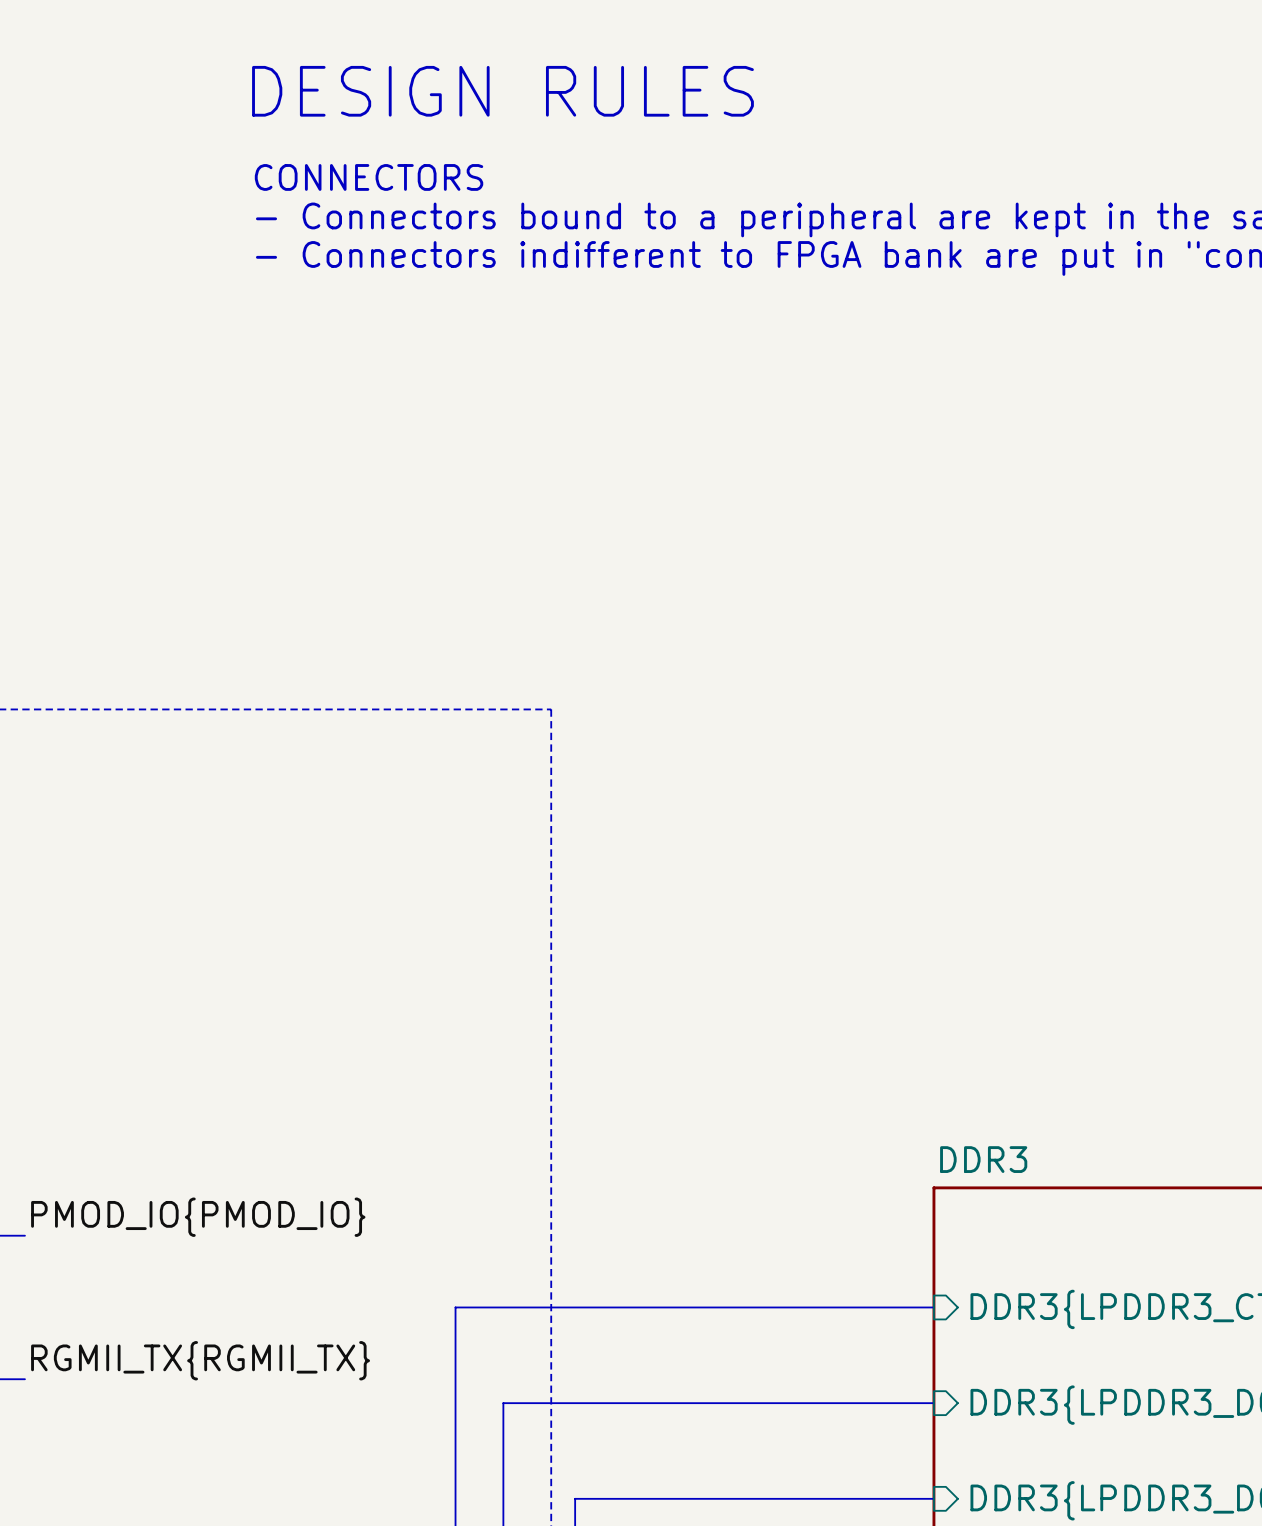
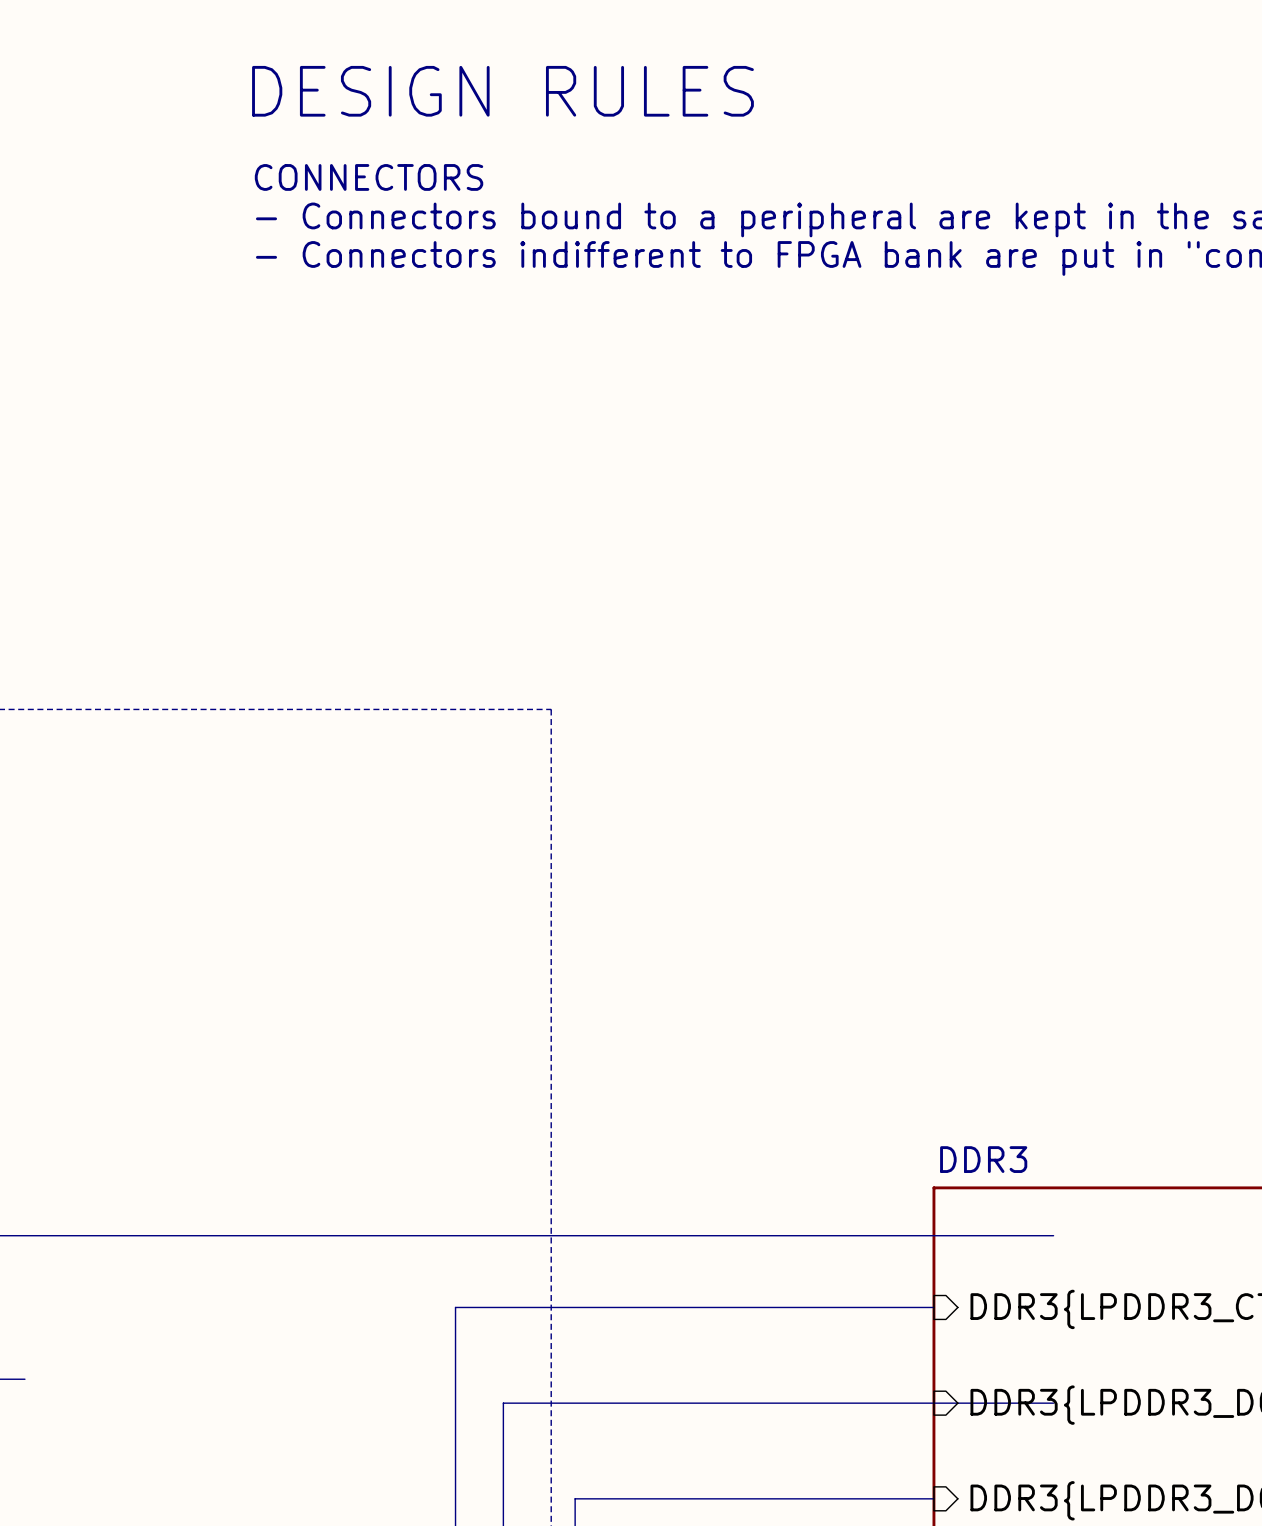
label: PMOD_IO{PMOD_IO} (198, 1217) -> none
bus: none -> (24, 1235) (1053, 1235)
label: RGMII_TX{RGMII_TX} (200, 1360) -> none
bus: none -> (933, 1403) (1053, 1403)

